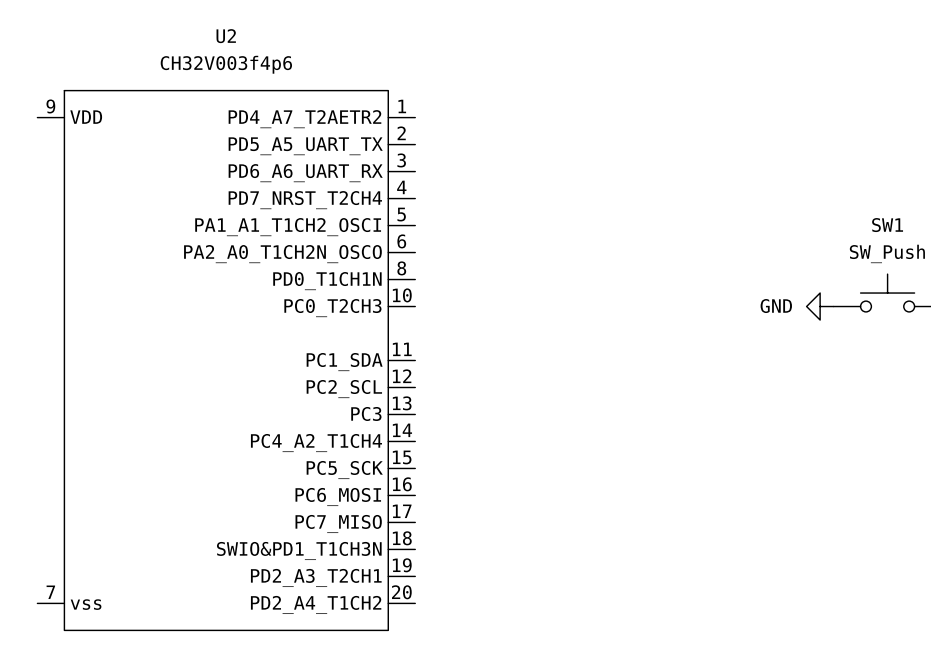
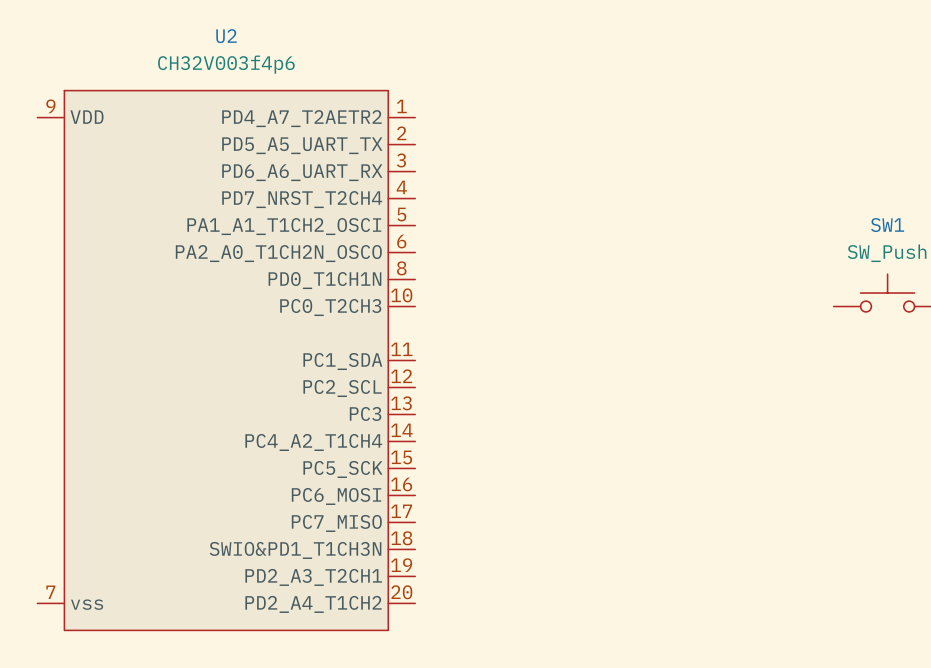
power symbol: GND (820, 306) -> none

